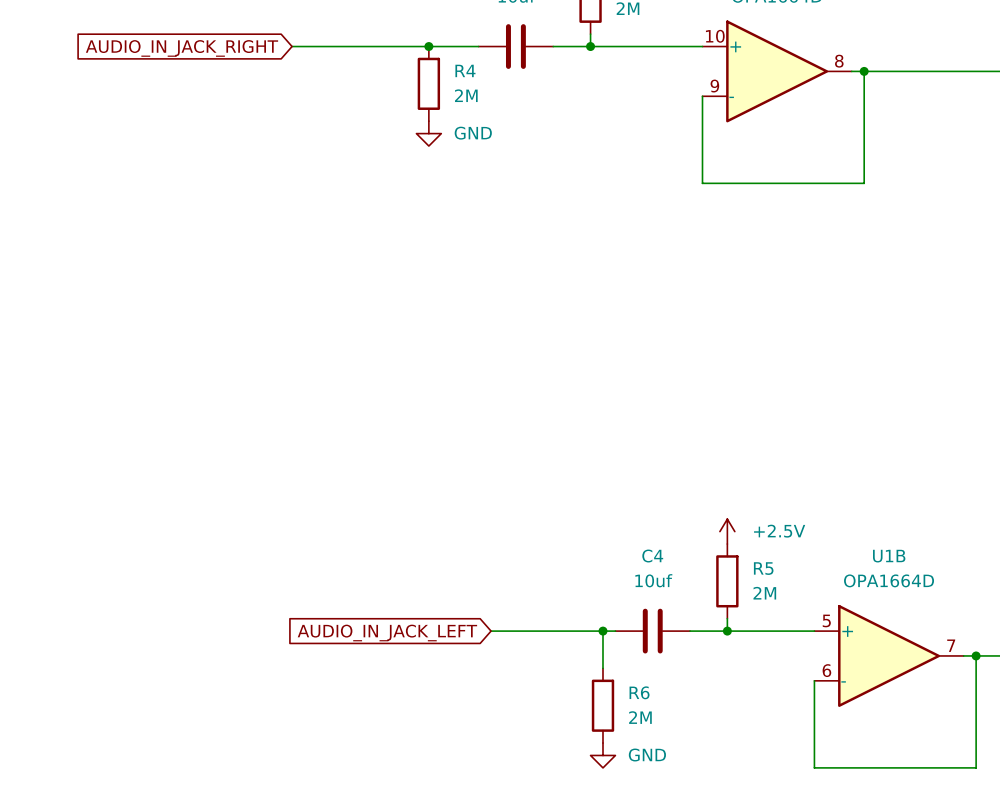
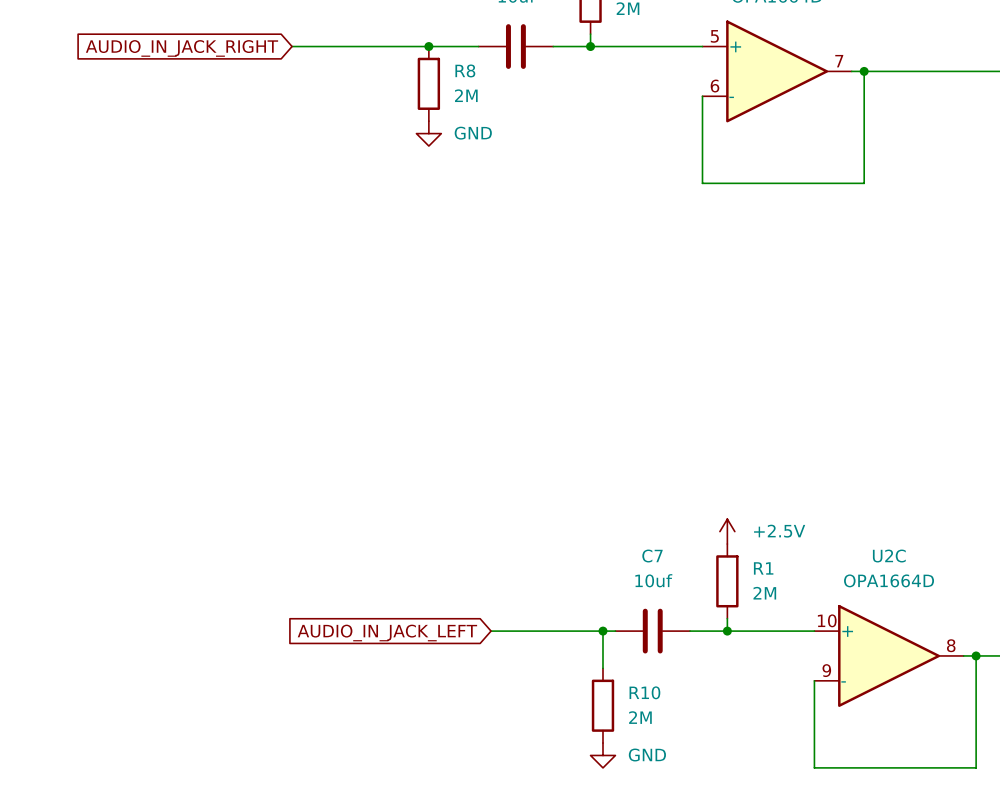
part pin number: 10 (715, 36) -> 5 (714, 36)
part pin number: 8 (839, 61) -> 7 (839, 61)
R4 name: R4 (465, 70) -> R8 (465, 70)
part pin number: 9 (714, 86) -> 6 (714, 86)
C4 name: C4 (652, 556) -> C7 (652, 556)
U1B name: U1B (889, 556) -> U2C (889, 556)
R5 name: R5 (763, 568) -> R1 (763, 568)
U1B pin number: 5 (826, 620) -> 10 (827, 620)
U1B pin number: 7 (951, 645) -> 8 (951, 645)
U1B pin number: 6 (826, 670) -> 9 (826, 670)
R6 name: R6 (639, 692) -> R10 (644, 692)

